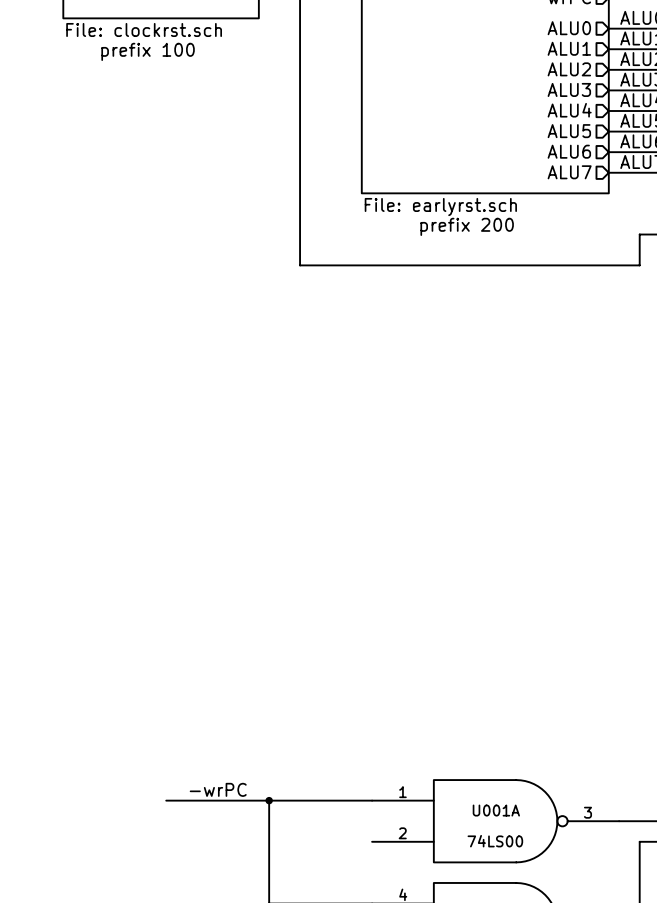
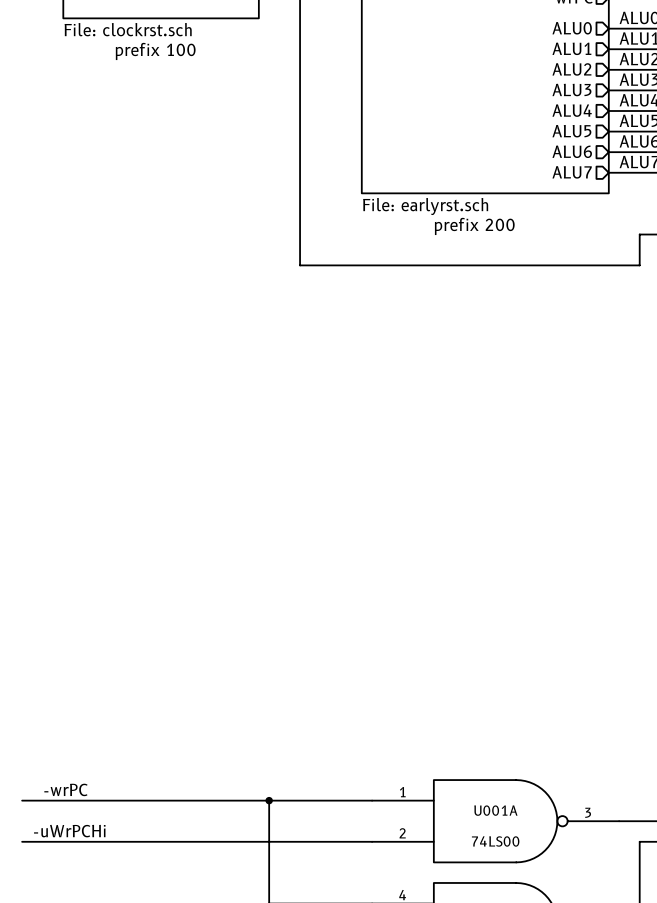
label position: -wrPC (218, 789) -> -wrPC (65, 789)
wire: none -> (22, 800) (166, 800)
label: none -> -uWrPCHi (69, 831)
wire: none -> (22, 841) (372, 841)

